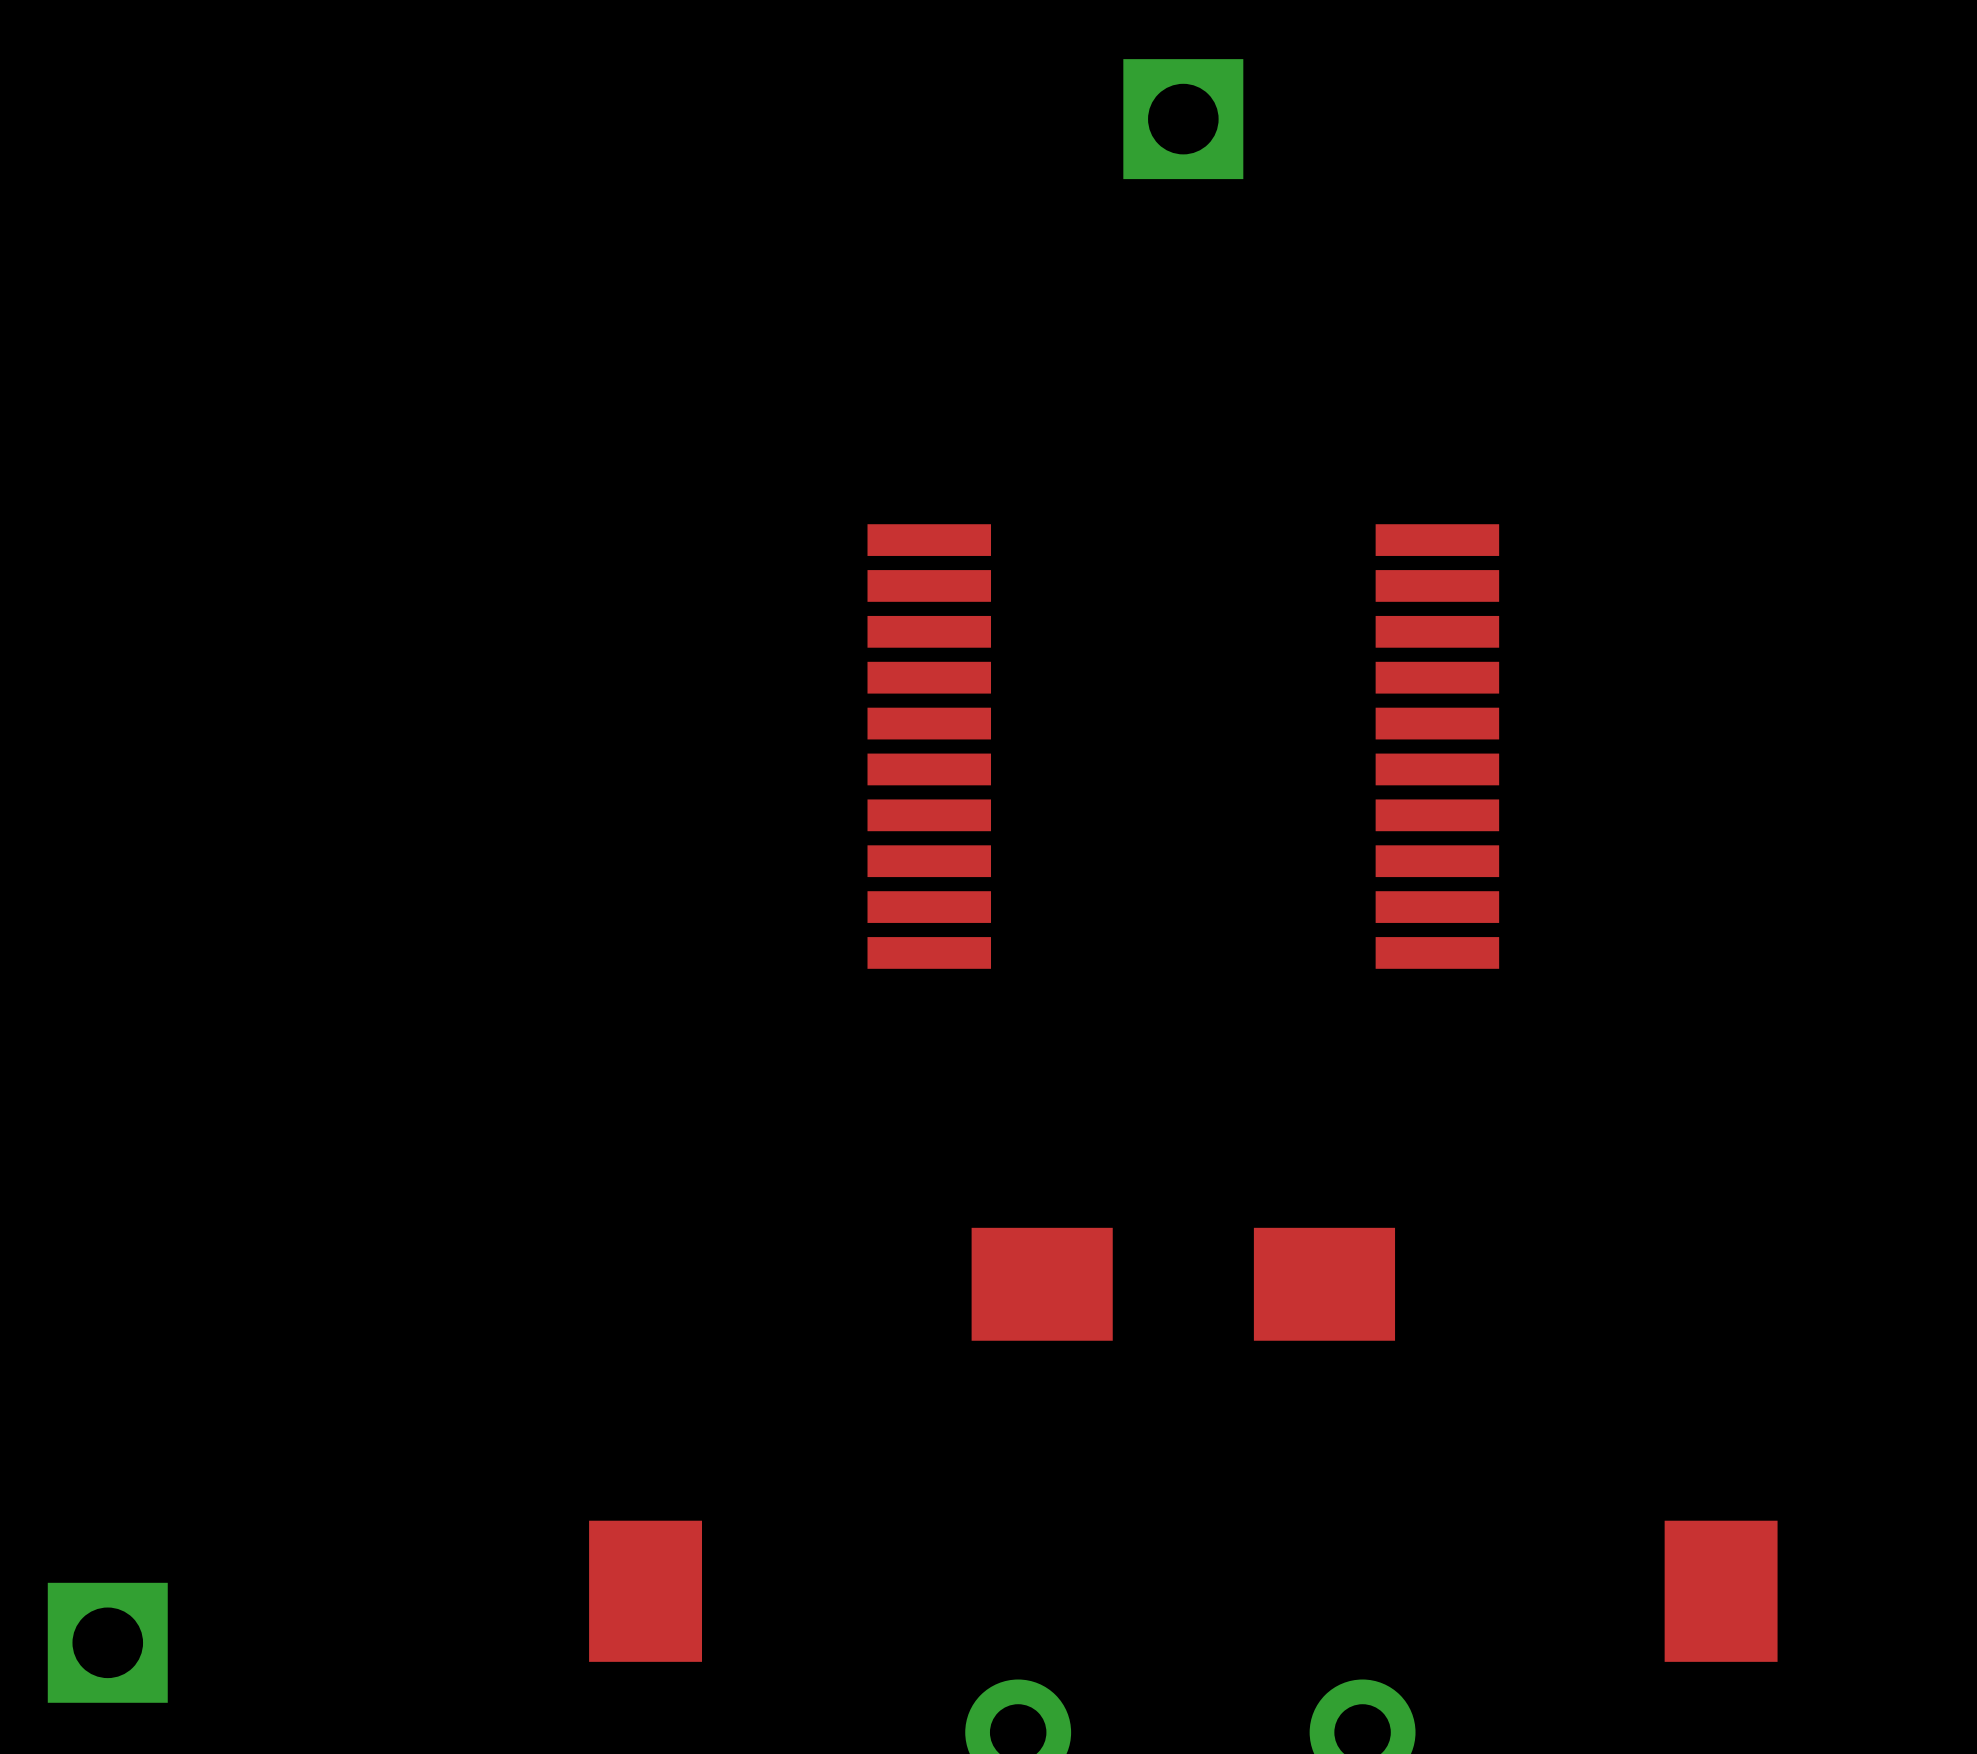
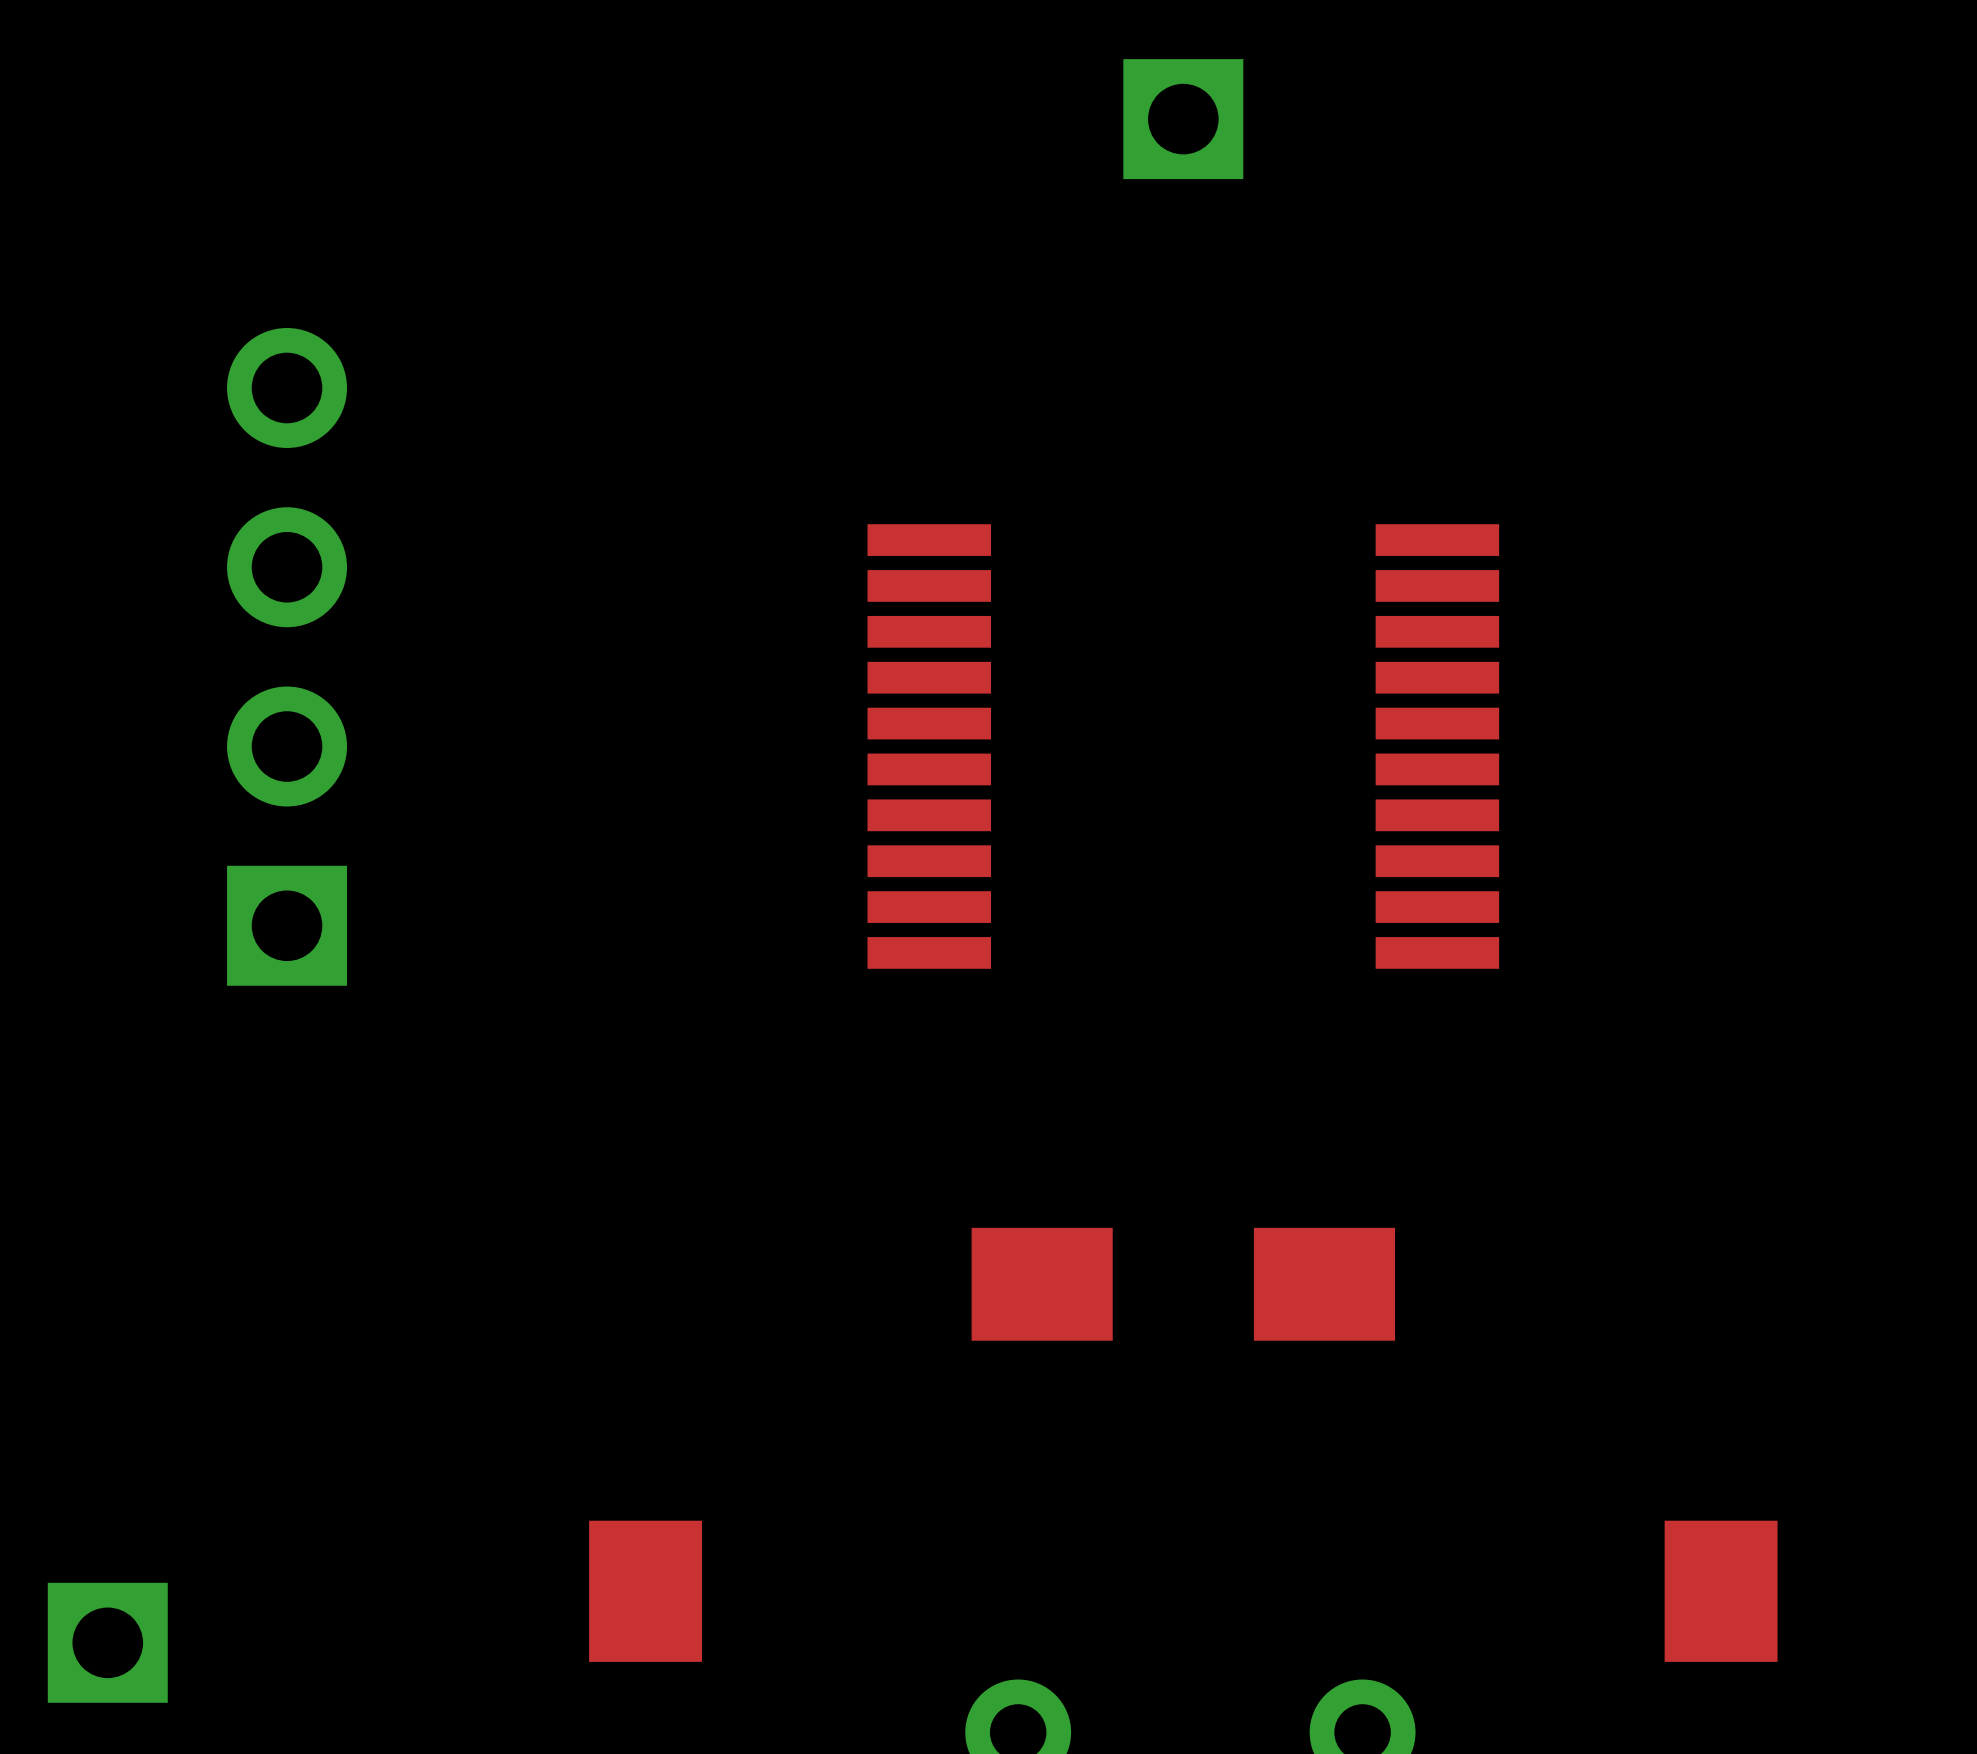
part: none -> (287, 656)

